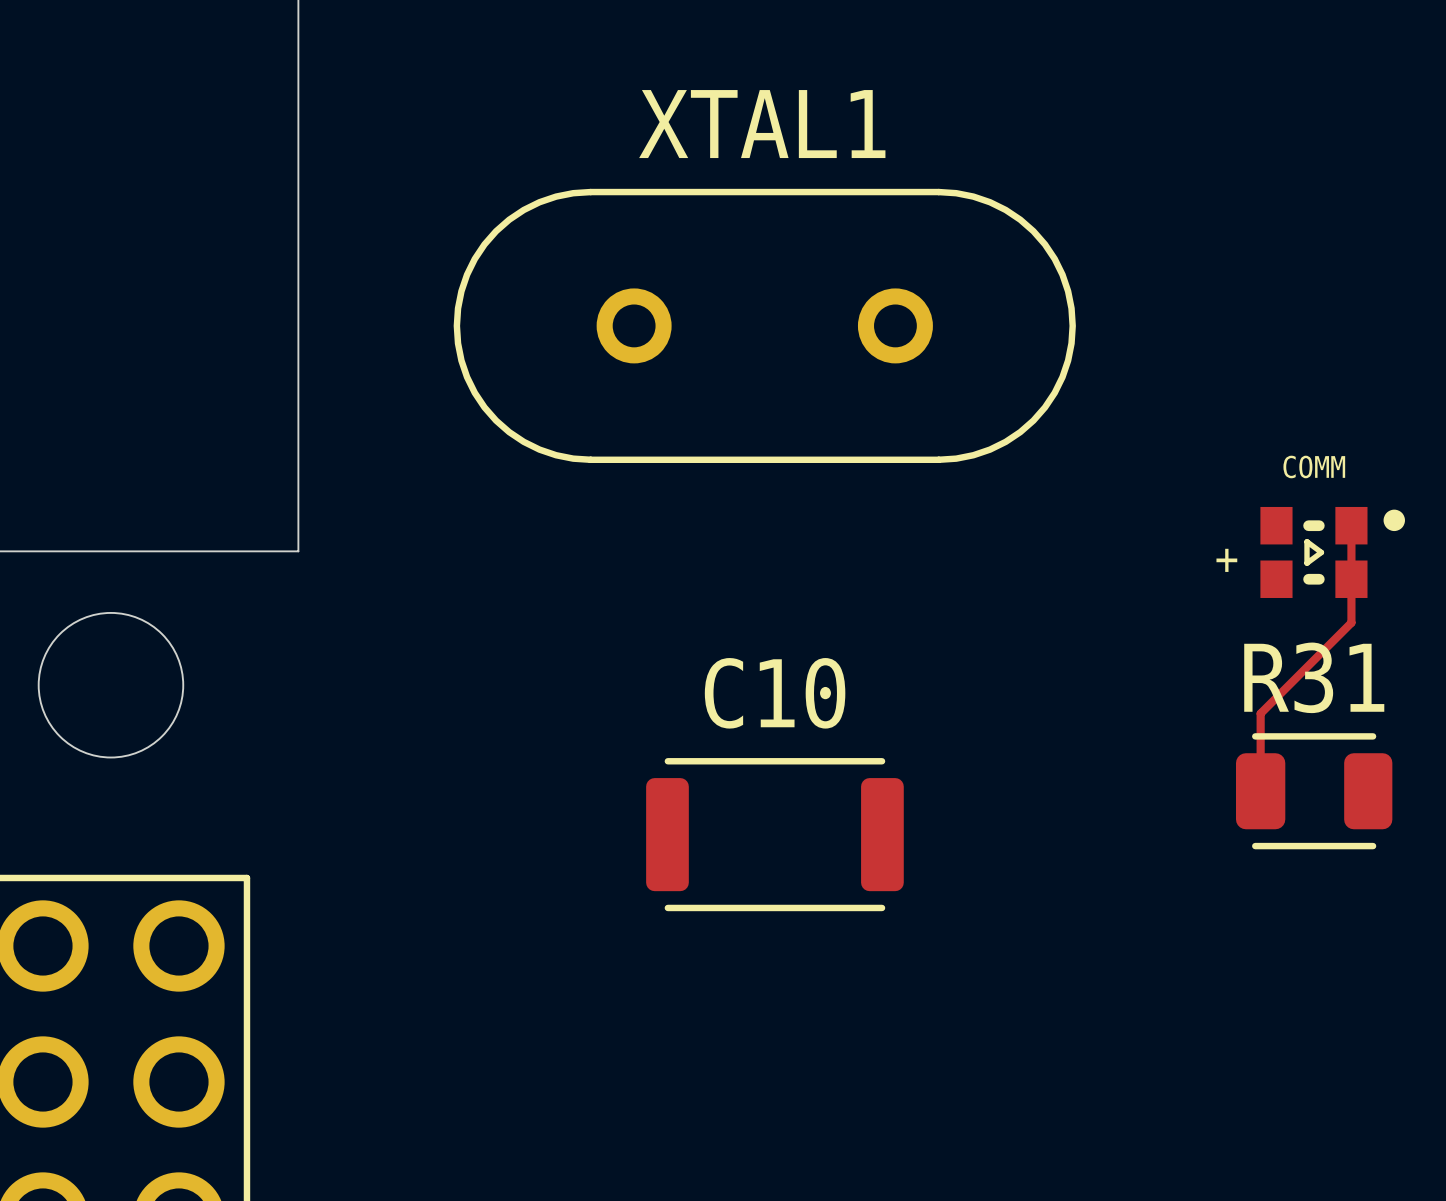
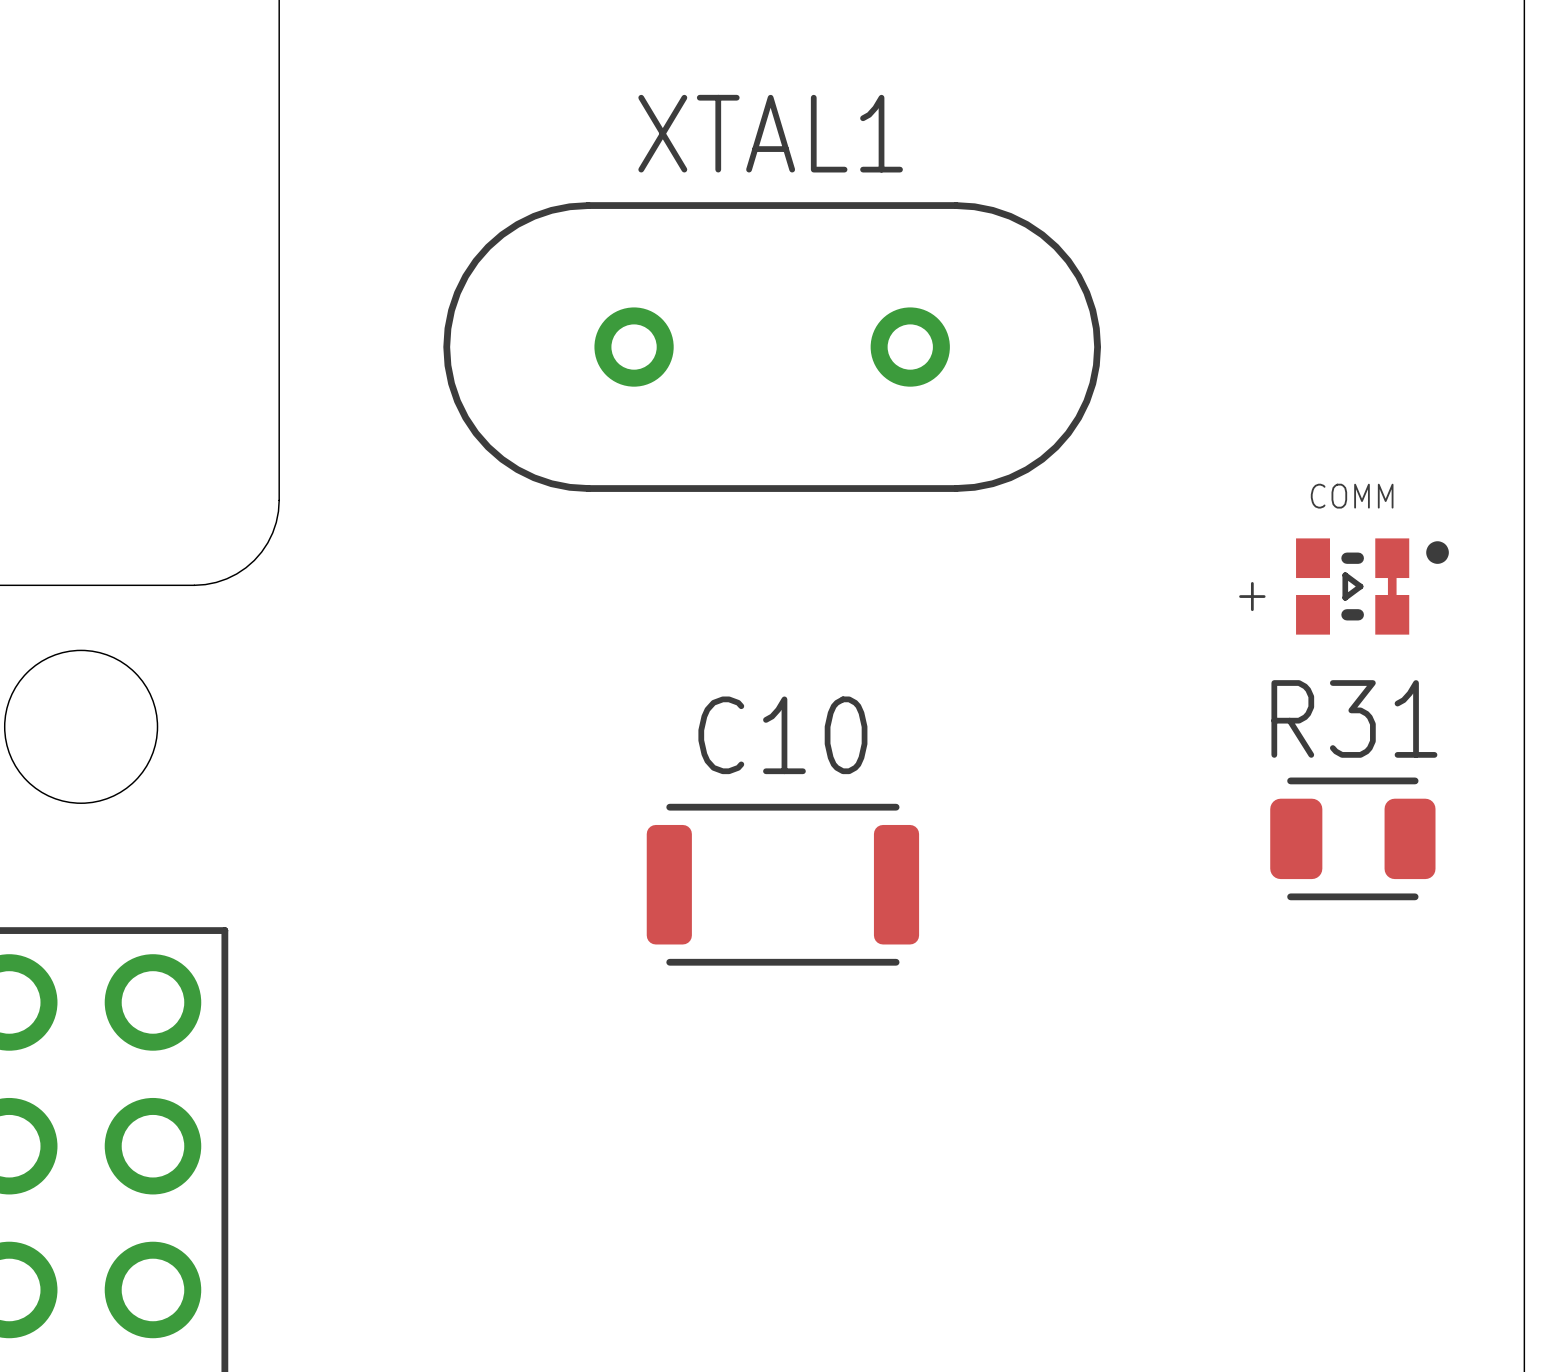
board edge: (298, 471) (298, 551) (218, 551) -> (279, 500) (272, 532) (254, 560) (226, 578) (194, 585)
top track: (1351, 579) (1351, 622) (1260, 713) (1260, 791) -> none

